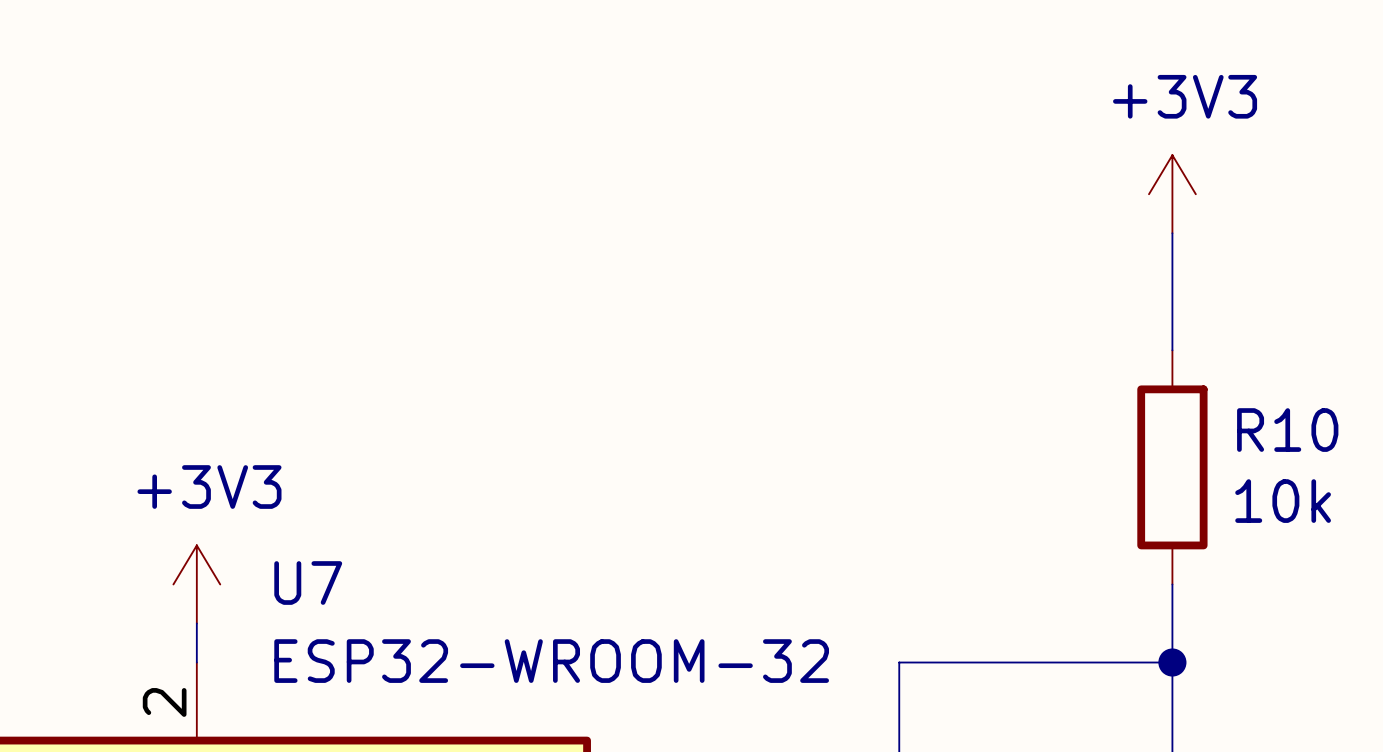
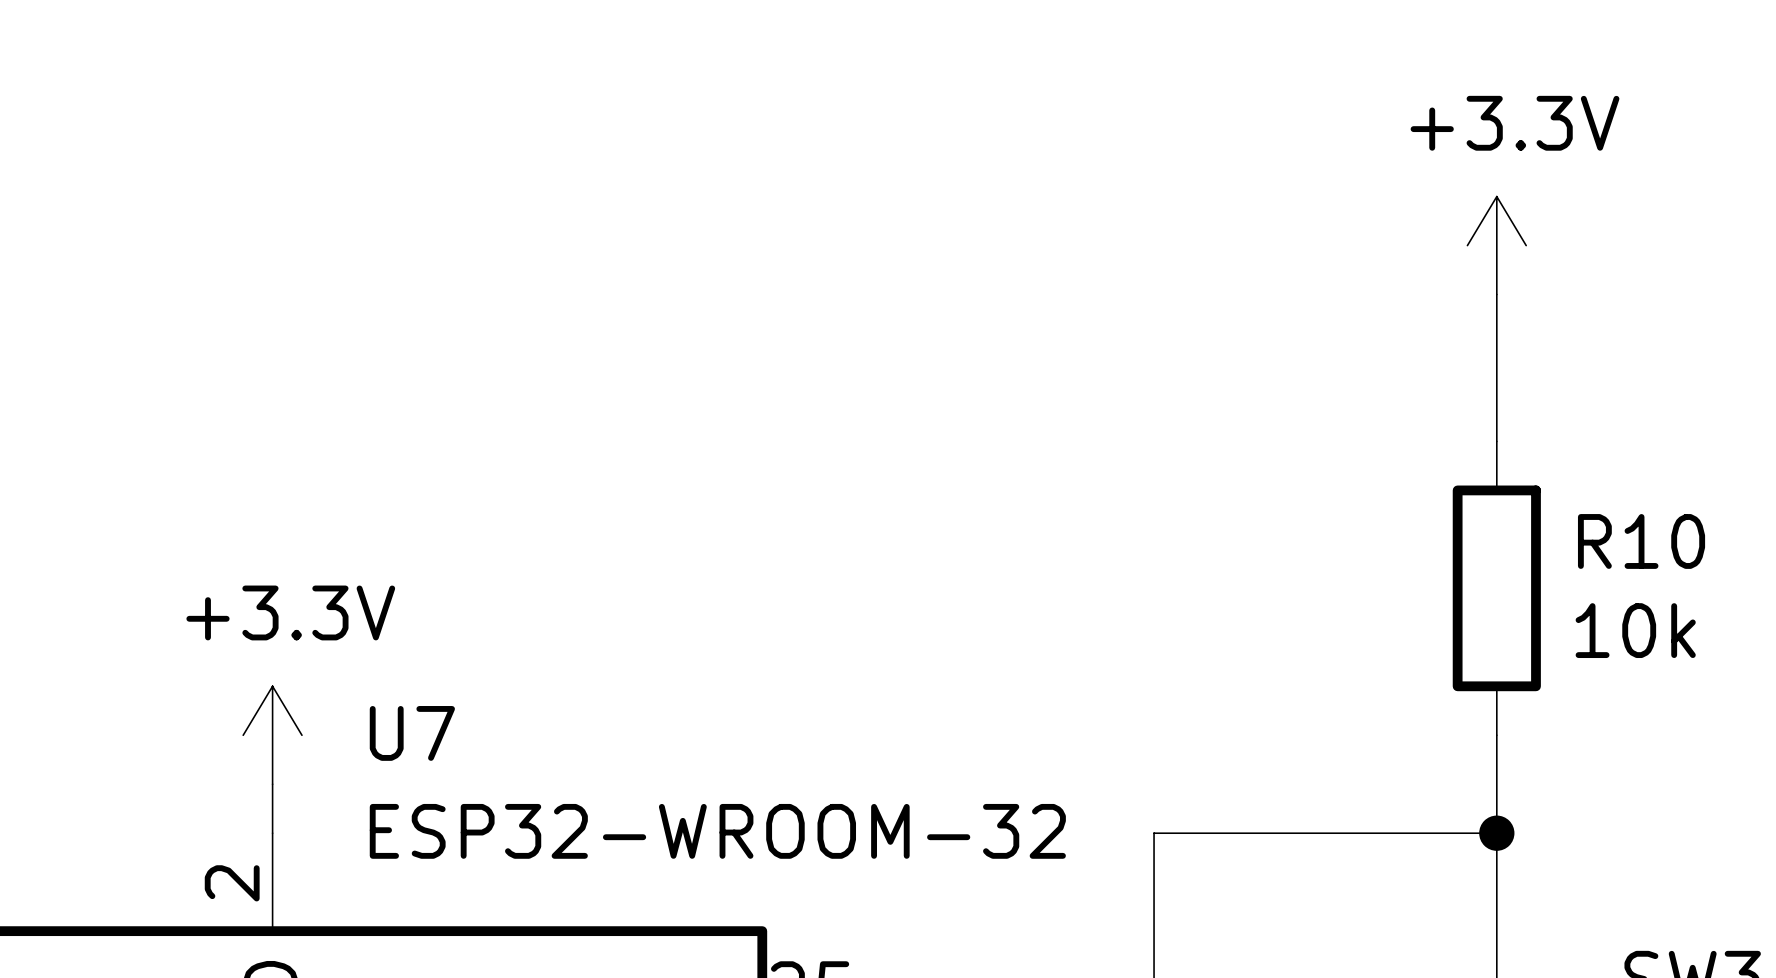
power symbol: +3V3 (1172, 194) -> +3.3V (1496, 245)
power symbol: +3V3 (196, 584) -> +3.3V (272, 735)

